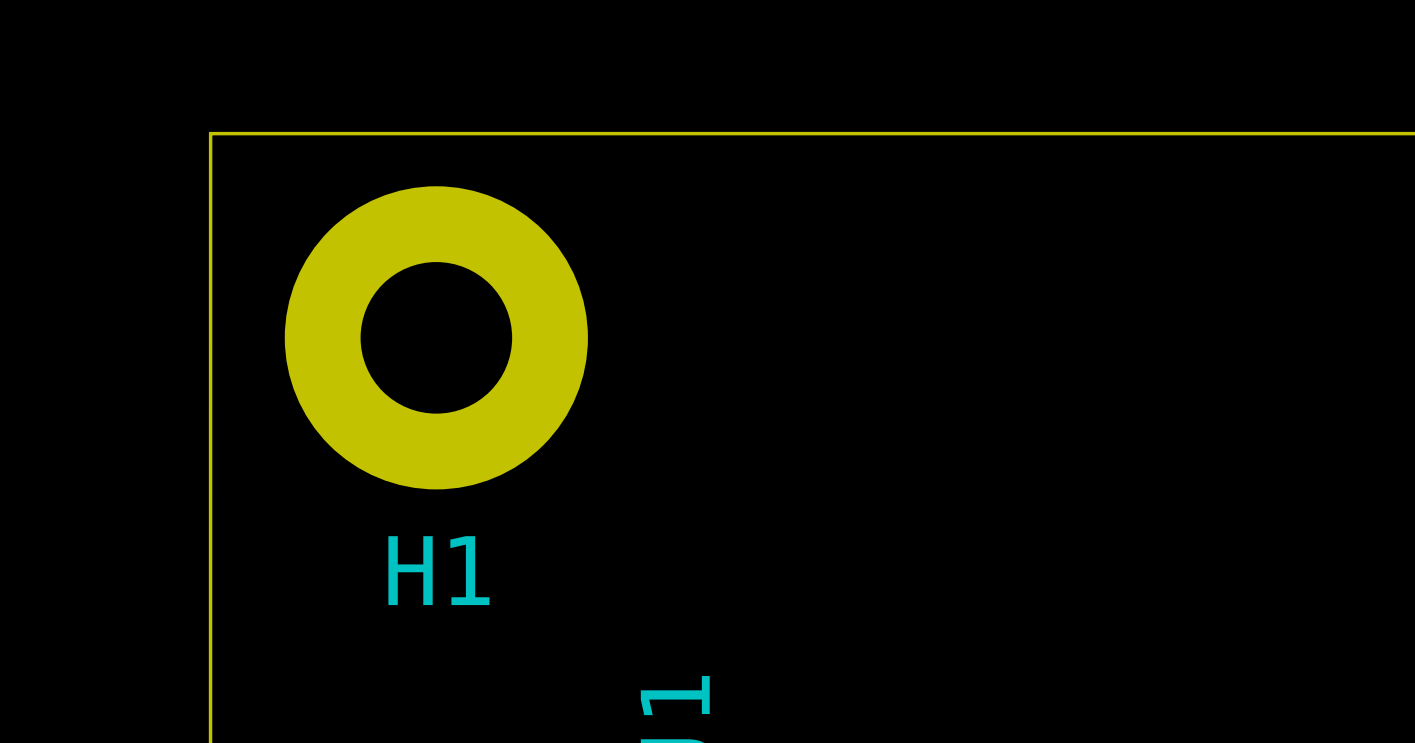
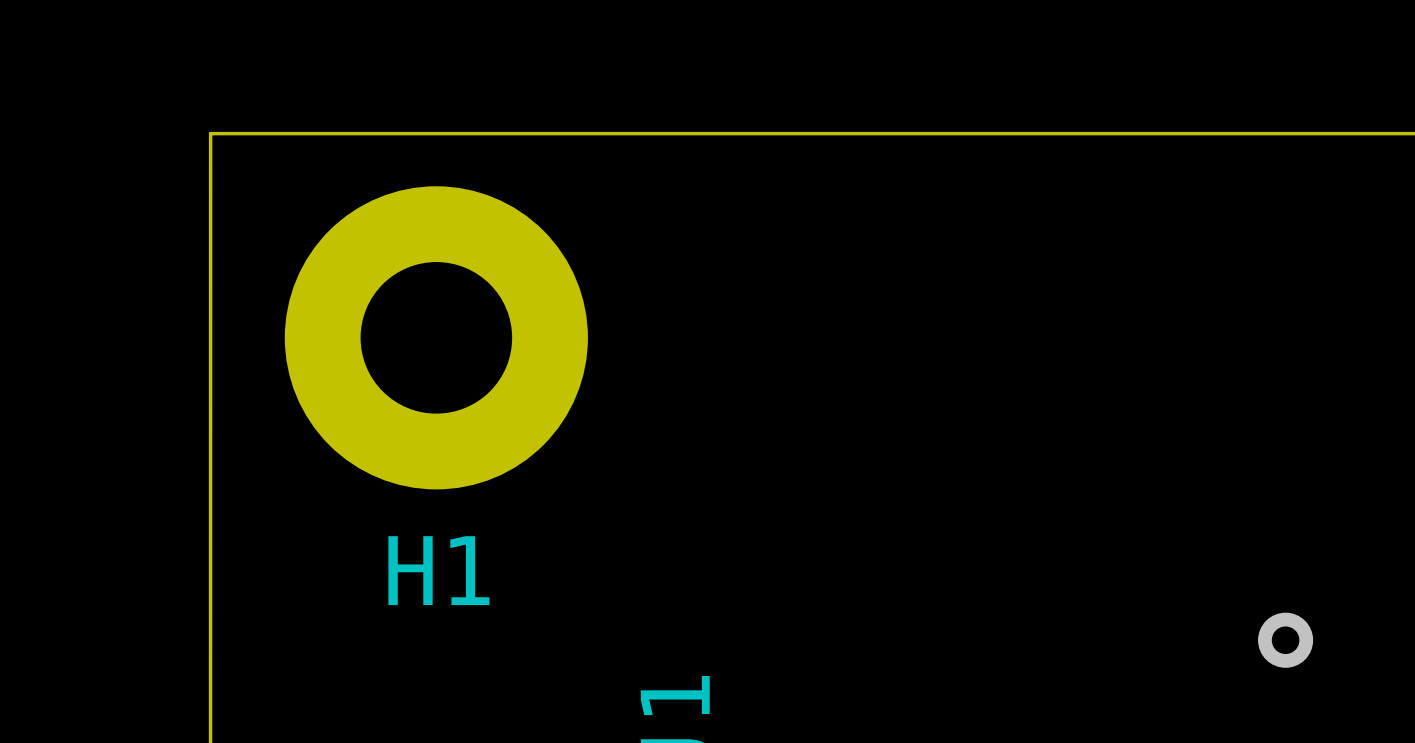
via: none -> (1285, 640)

